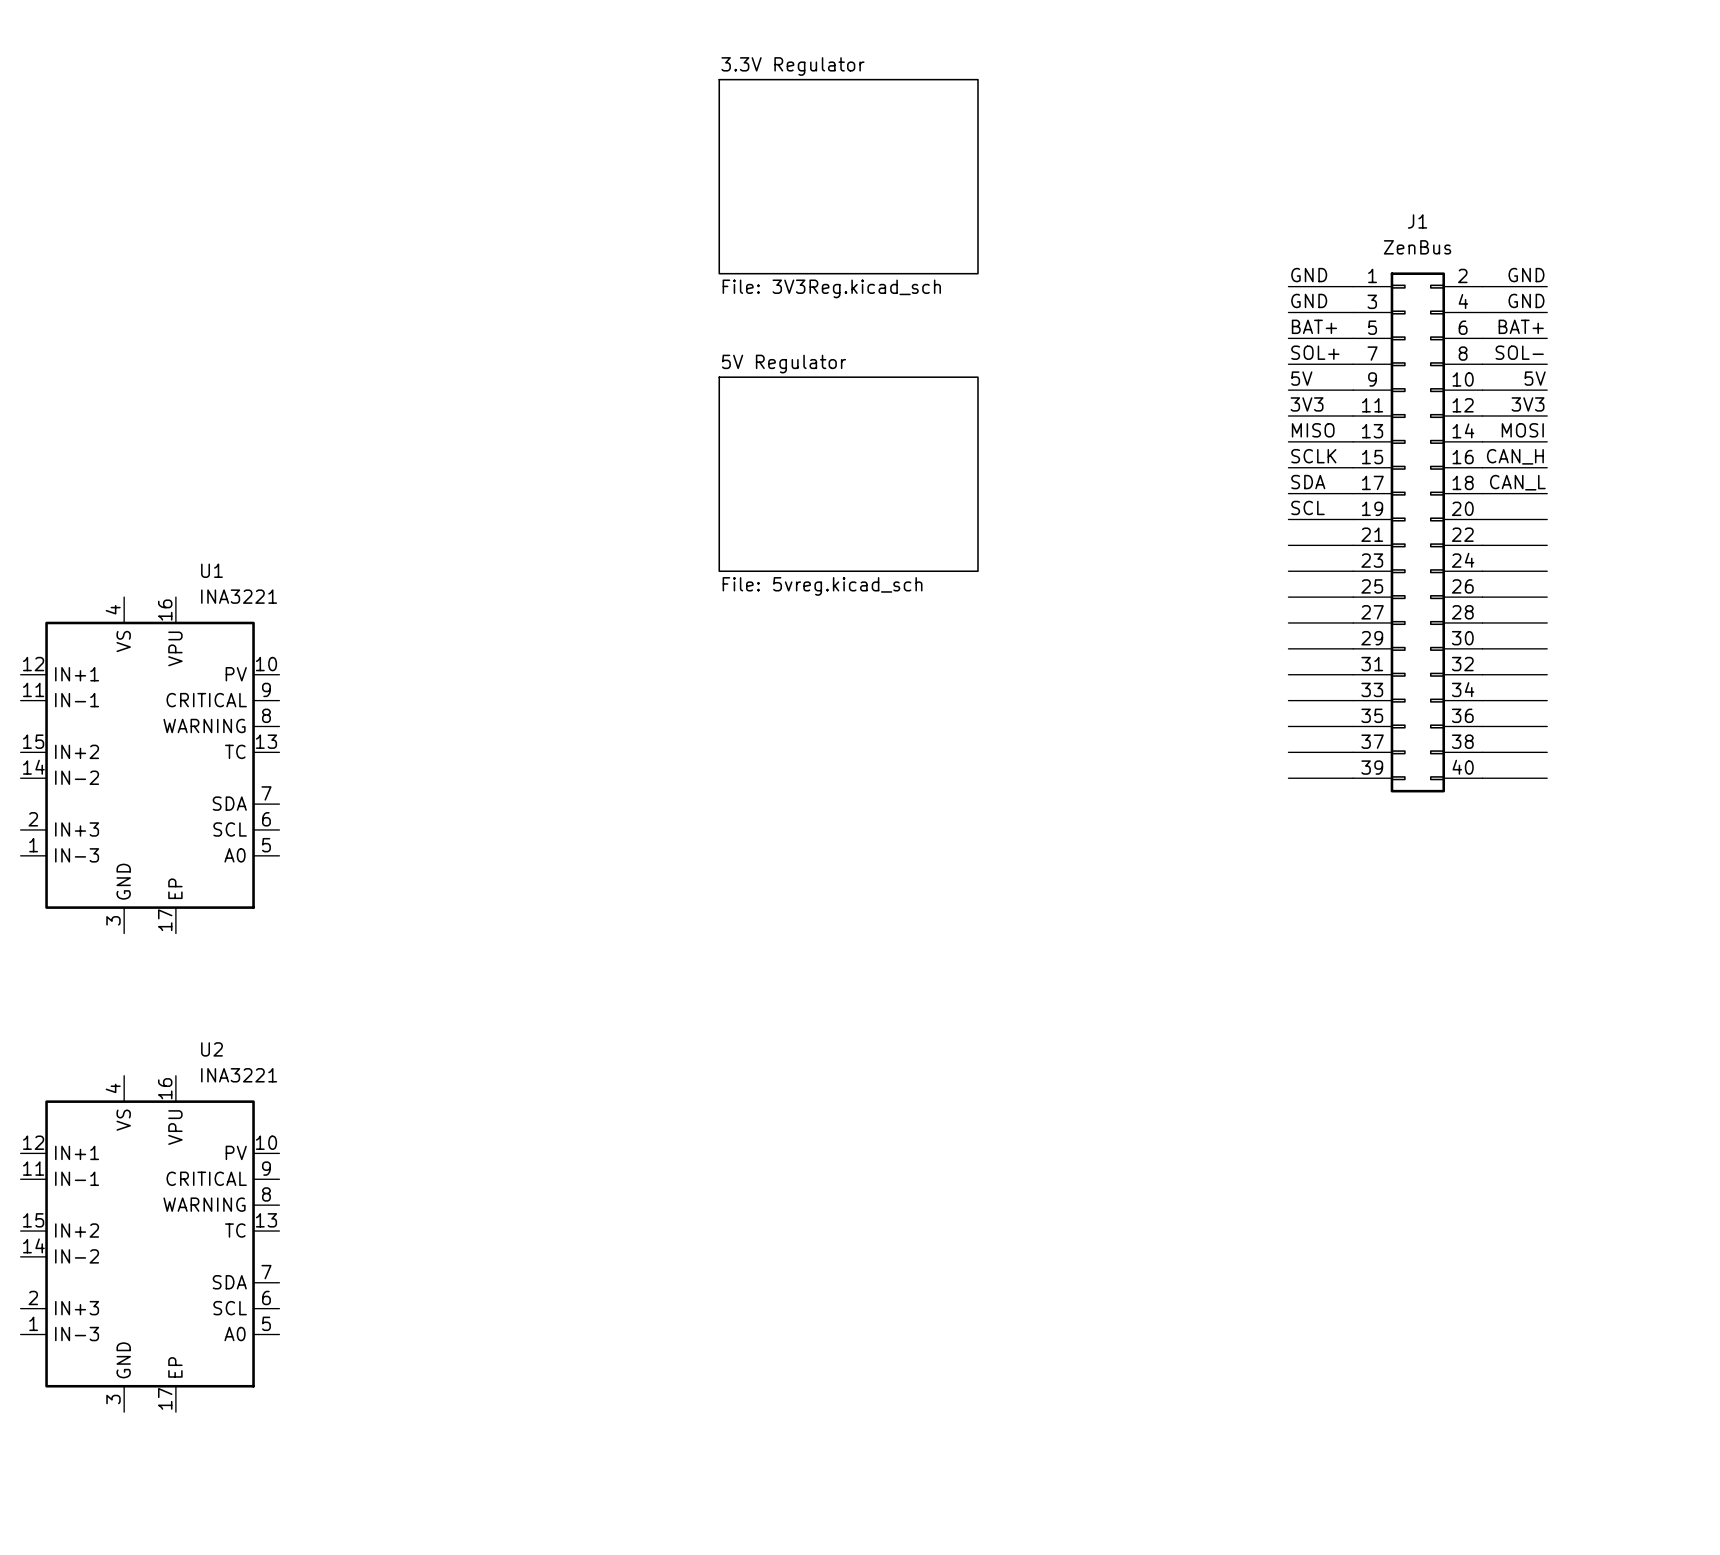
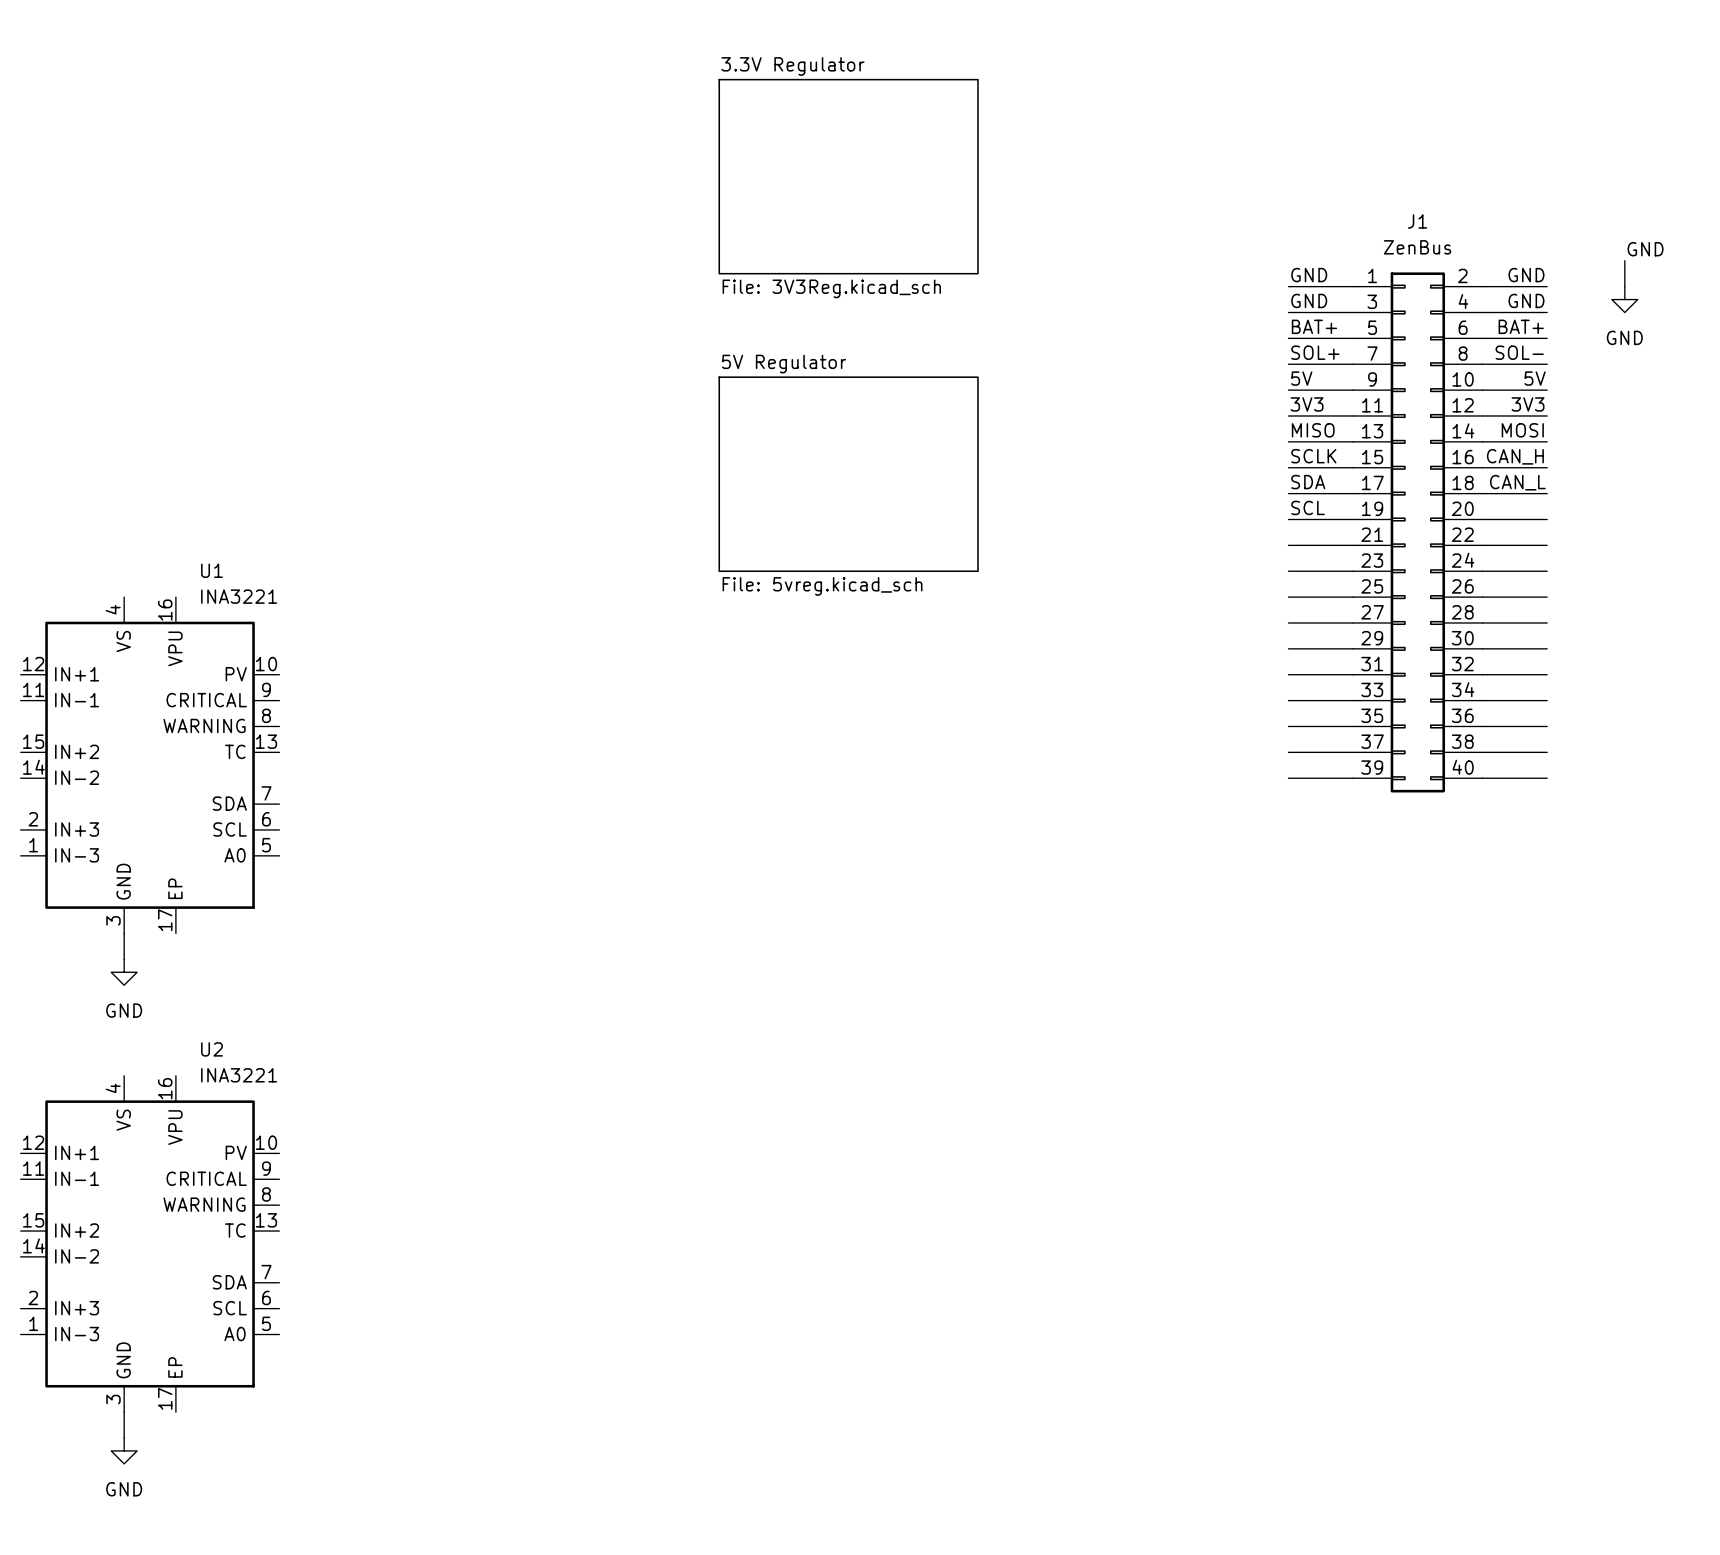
label: none -> GND (1645, 249)
wire: none -> (1624, 260) (1624, 286)
power symbol: none -> GND (1624, 299)
wire: none -> (124, 933) (124, 959)
power symbol: none -> GND (124, 972)
wire: none -> (124, 1412) (124, 1438)
power symbol: none -> GND (124, 1450)

